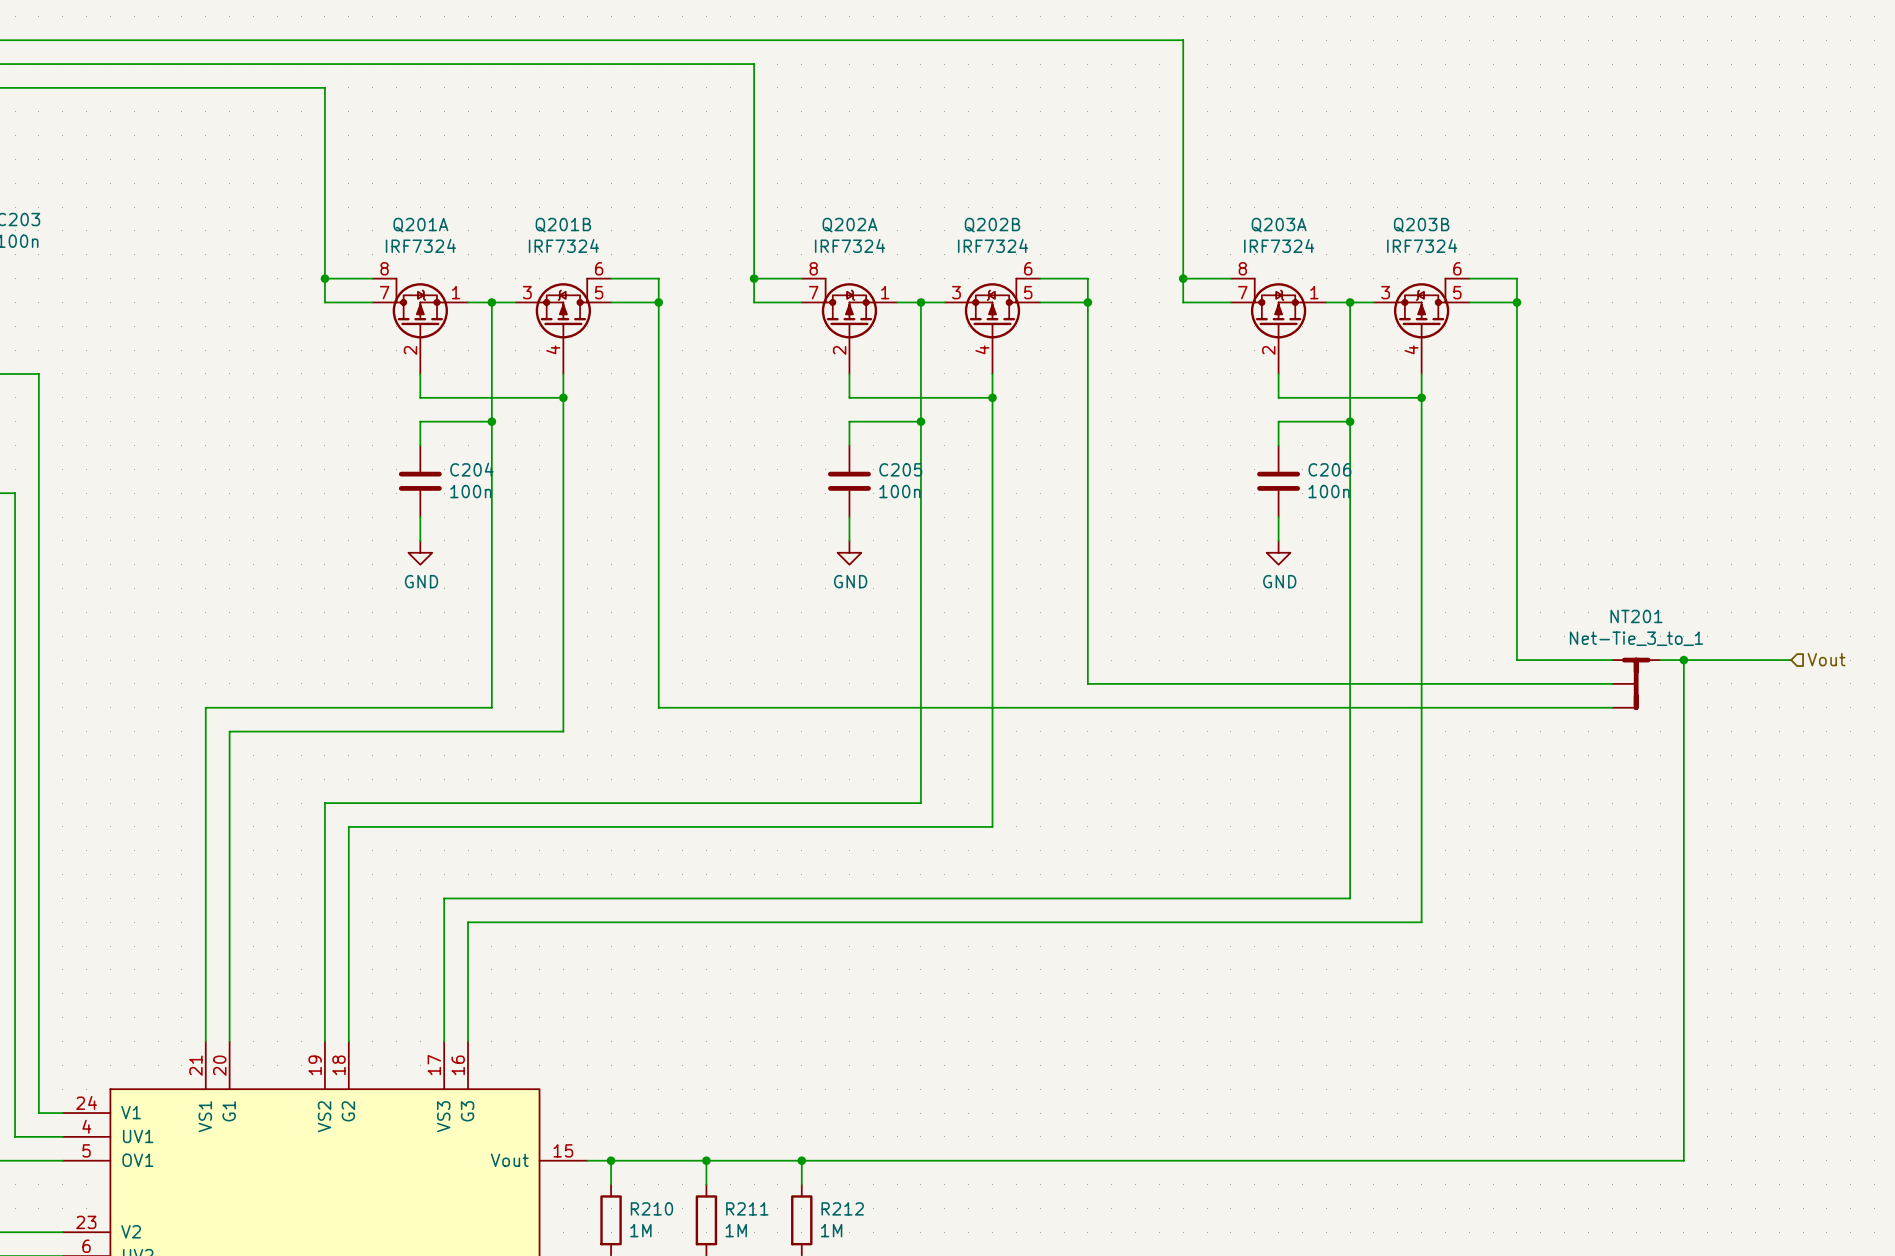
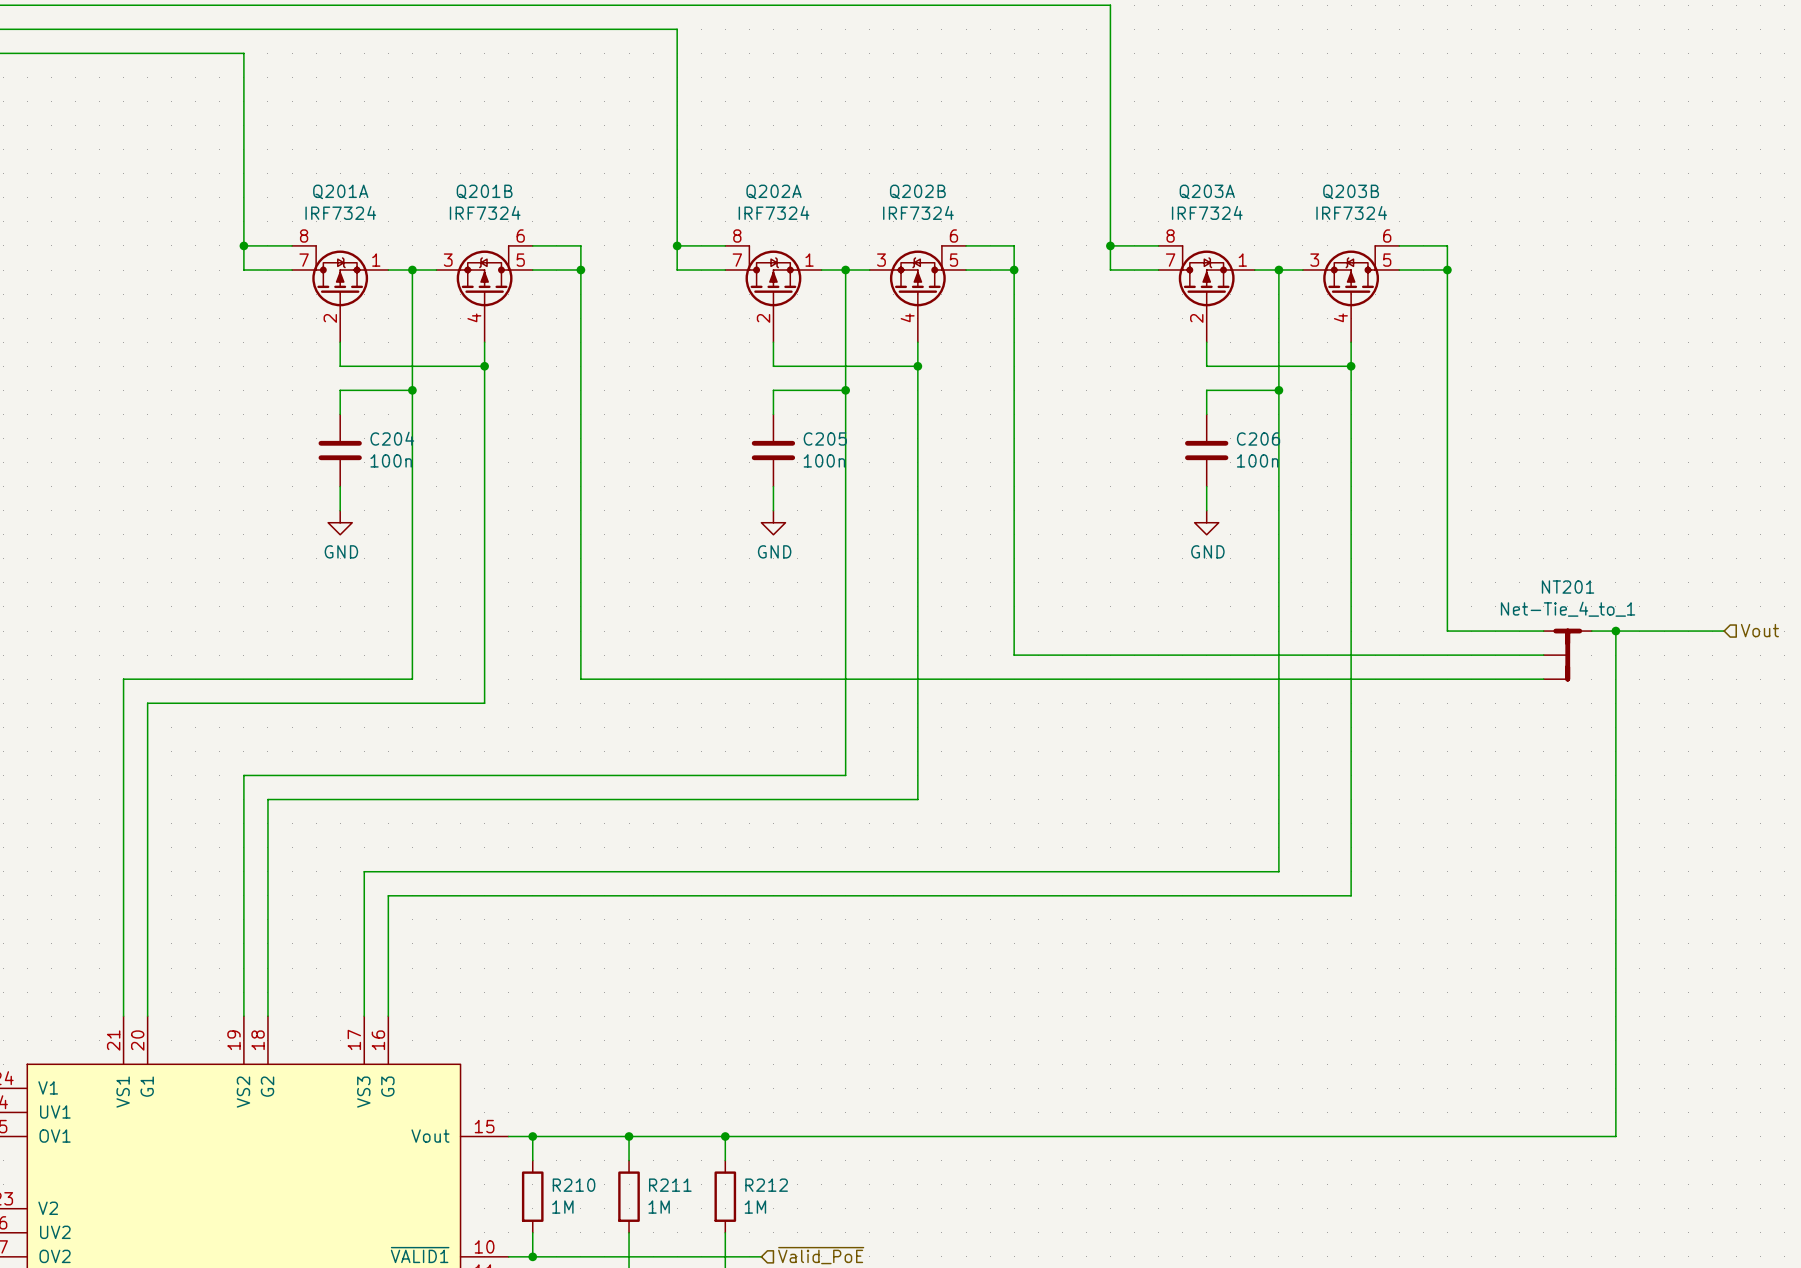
NT201 value: Net-Tie_3_to_1 (1636, 638) -> Net-Tie_4_to_1 (1568, 609)

